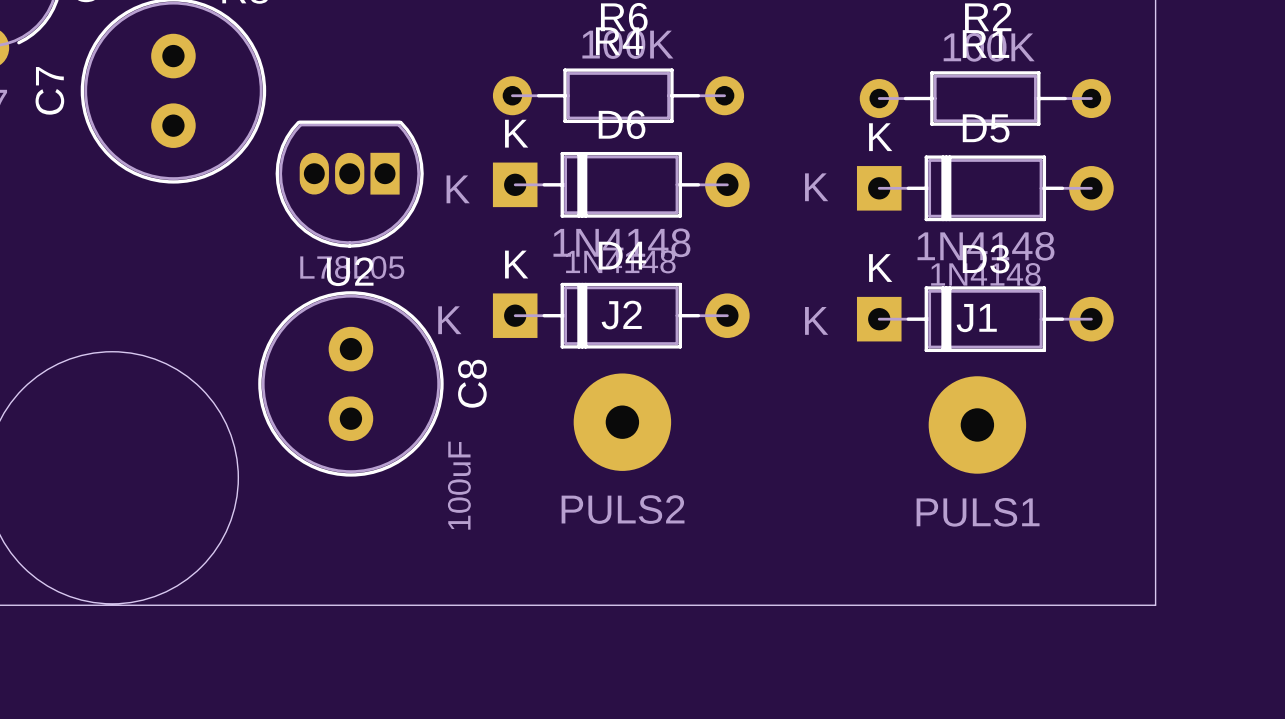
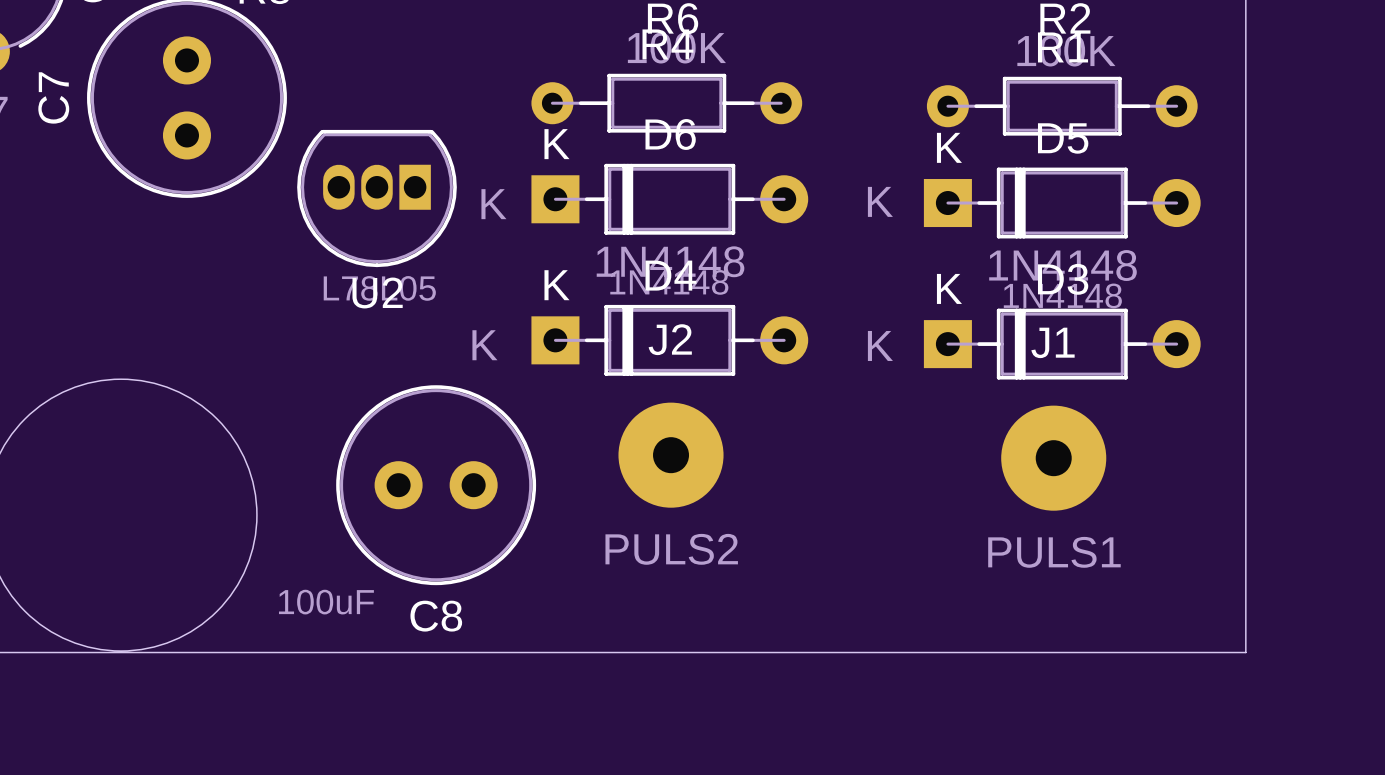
C8 rotation: 0° (350, 383) -> 90° clockwise (436, 485)

